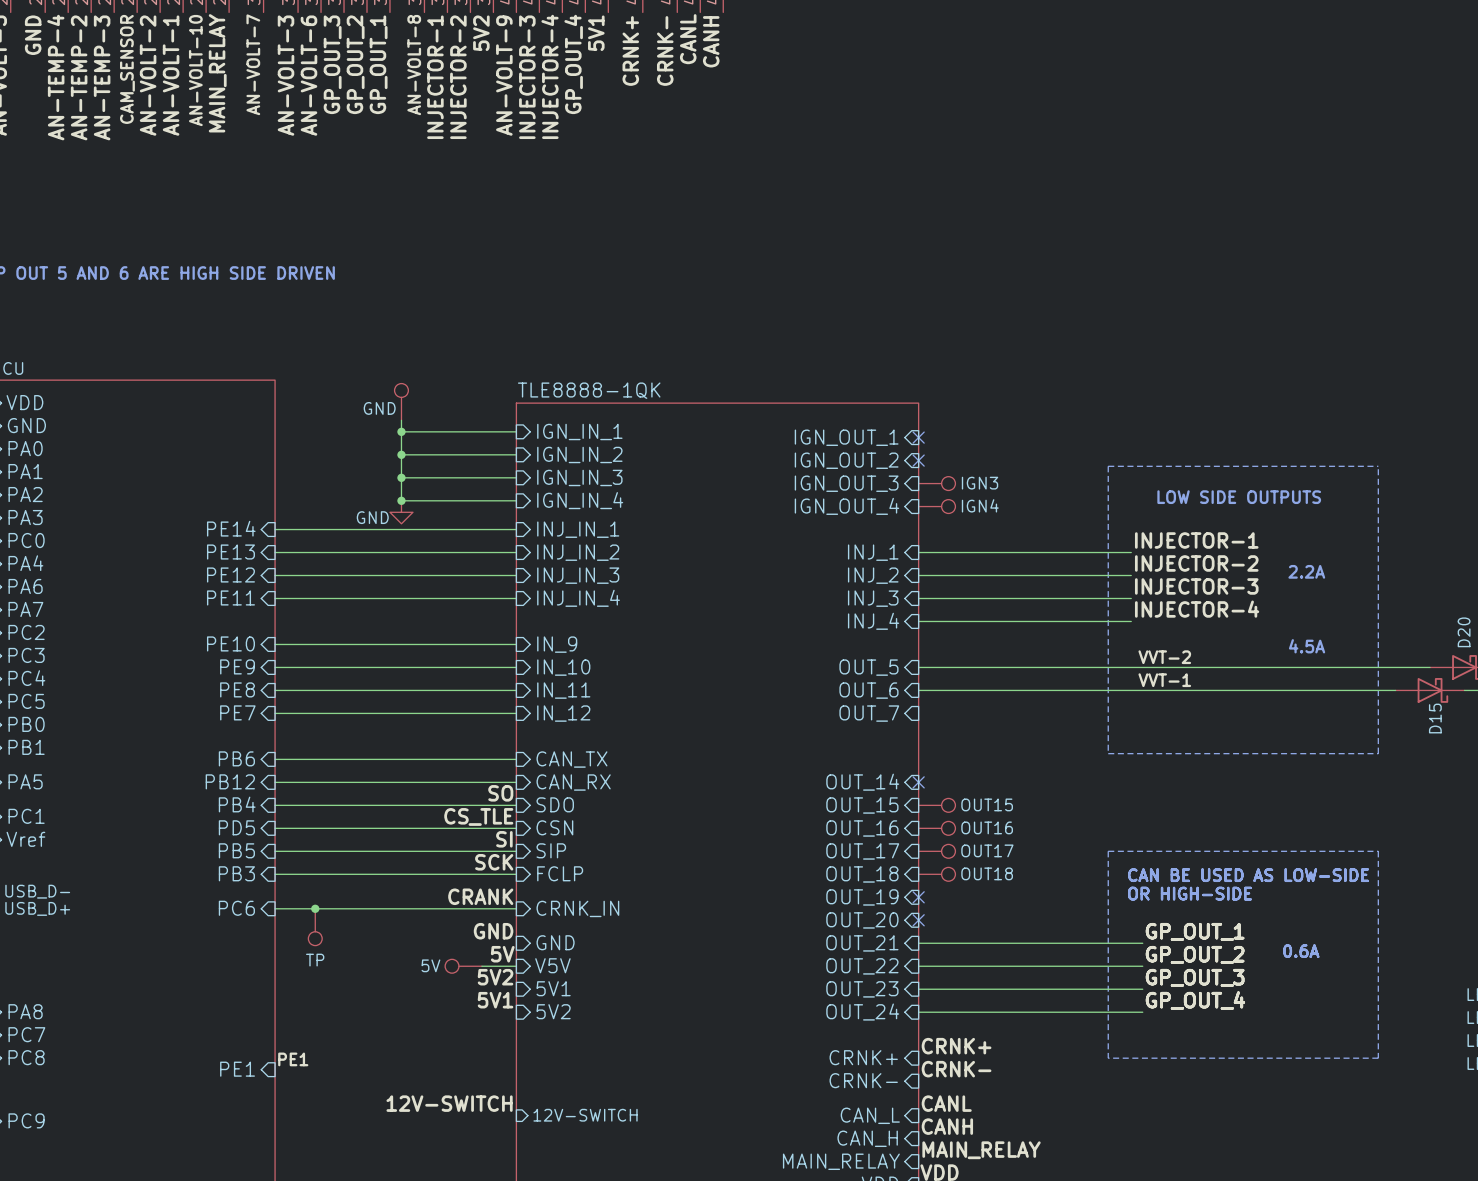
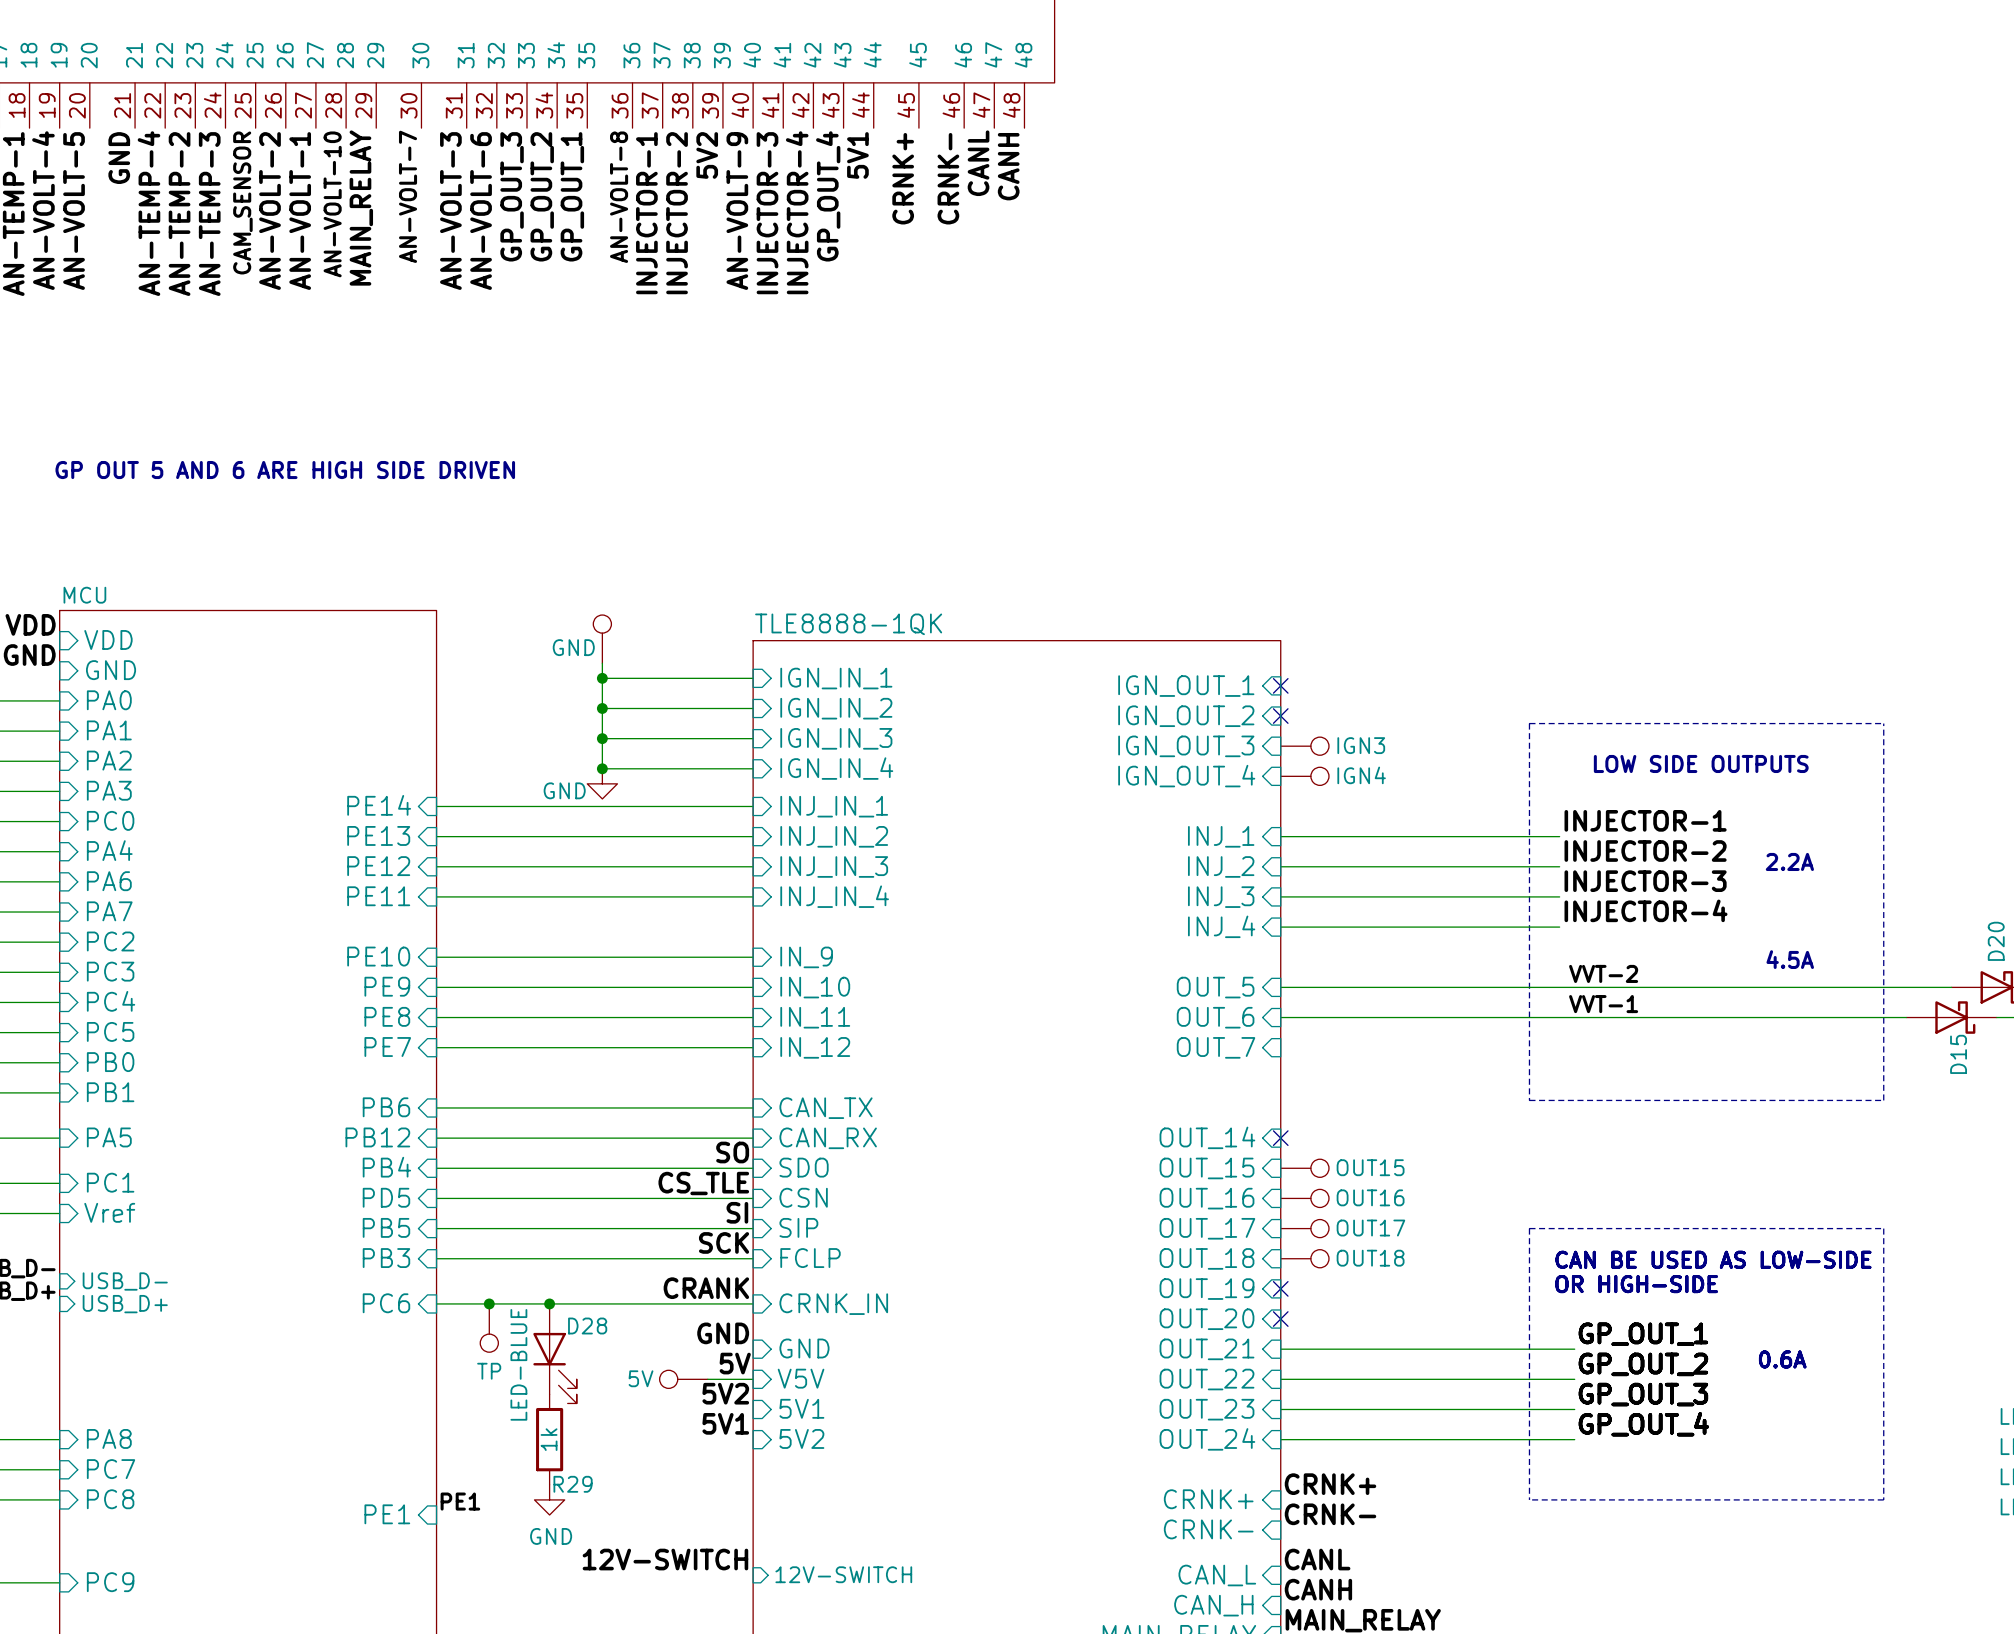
junction: none -> (549, 1303)
D28: none -> LED-BLUE (555, 1353)
R29: none -> 1k (549, 1439)
power symbol: none -> GND (549, 1499)

